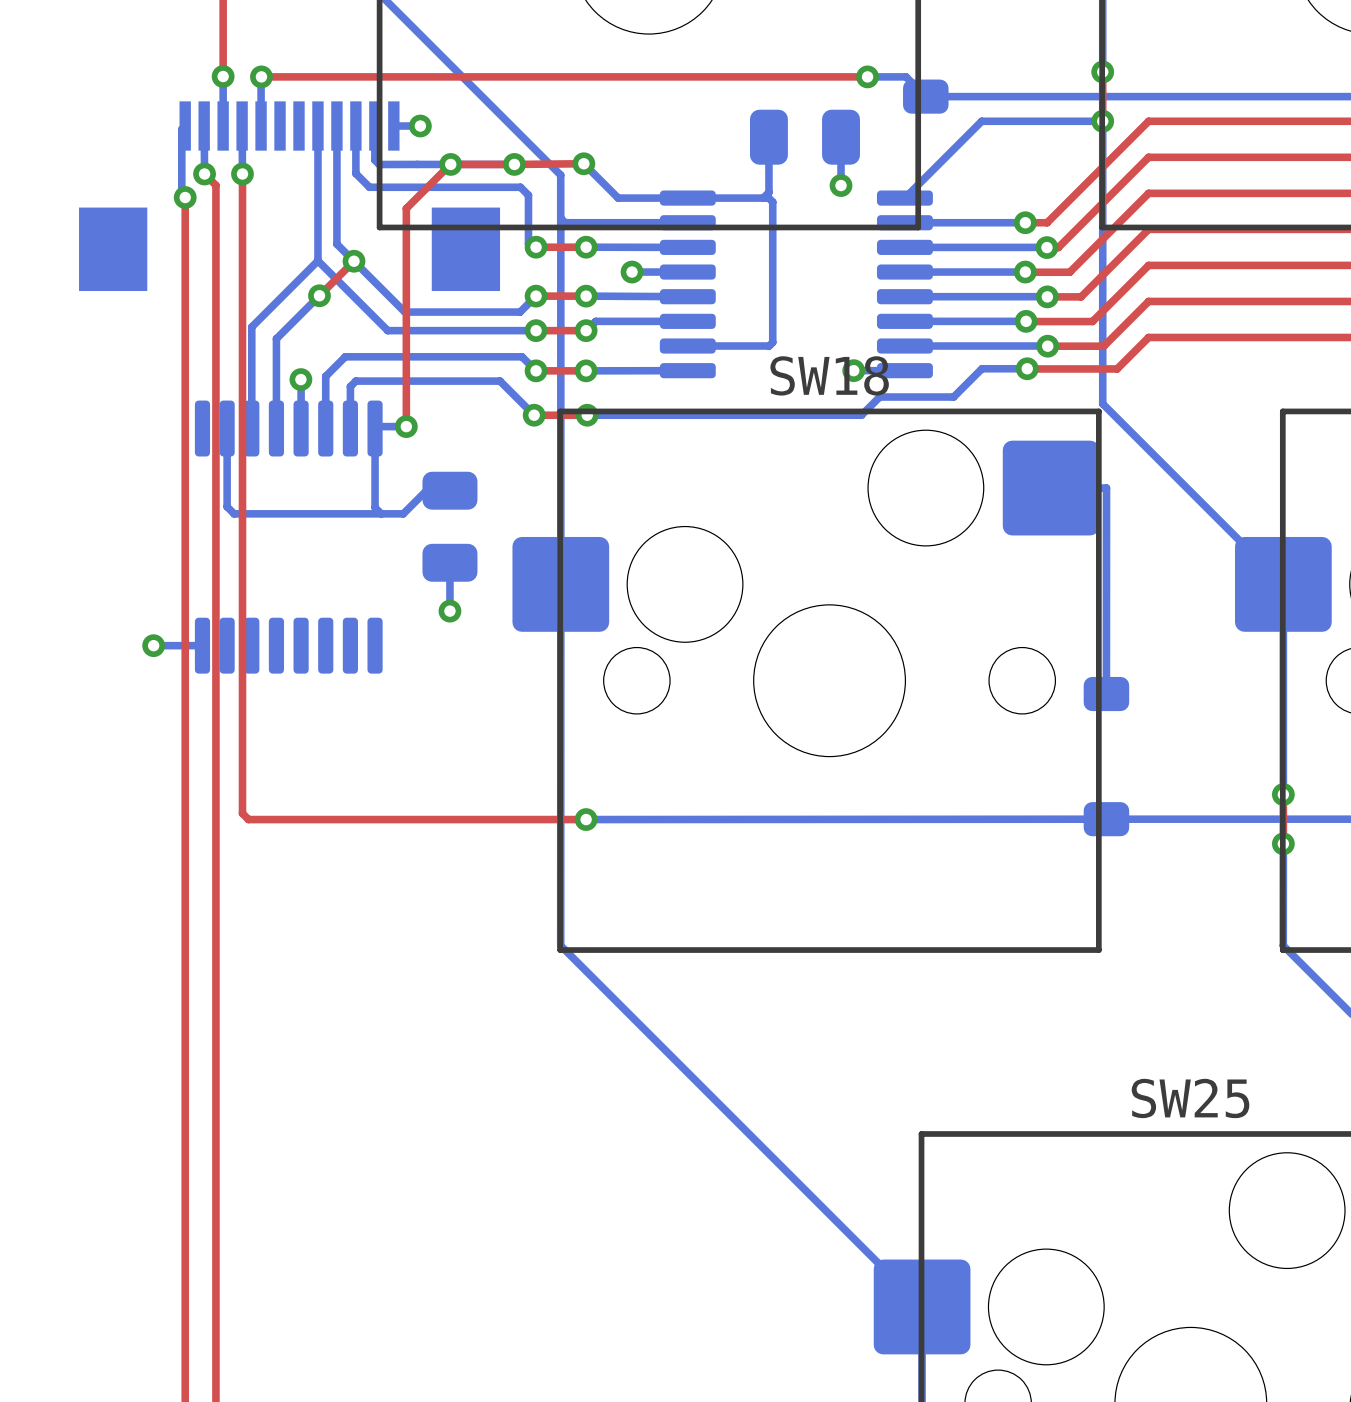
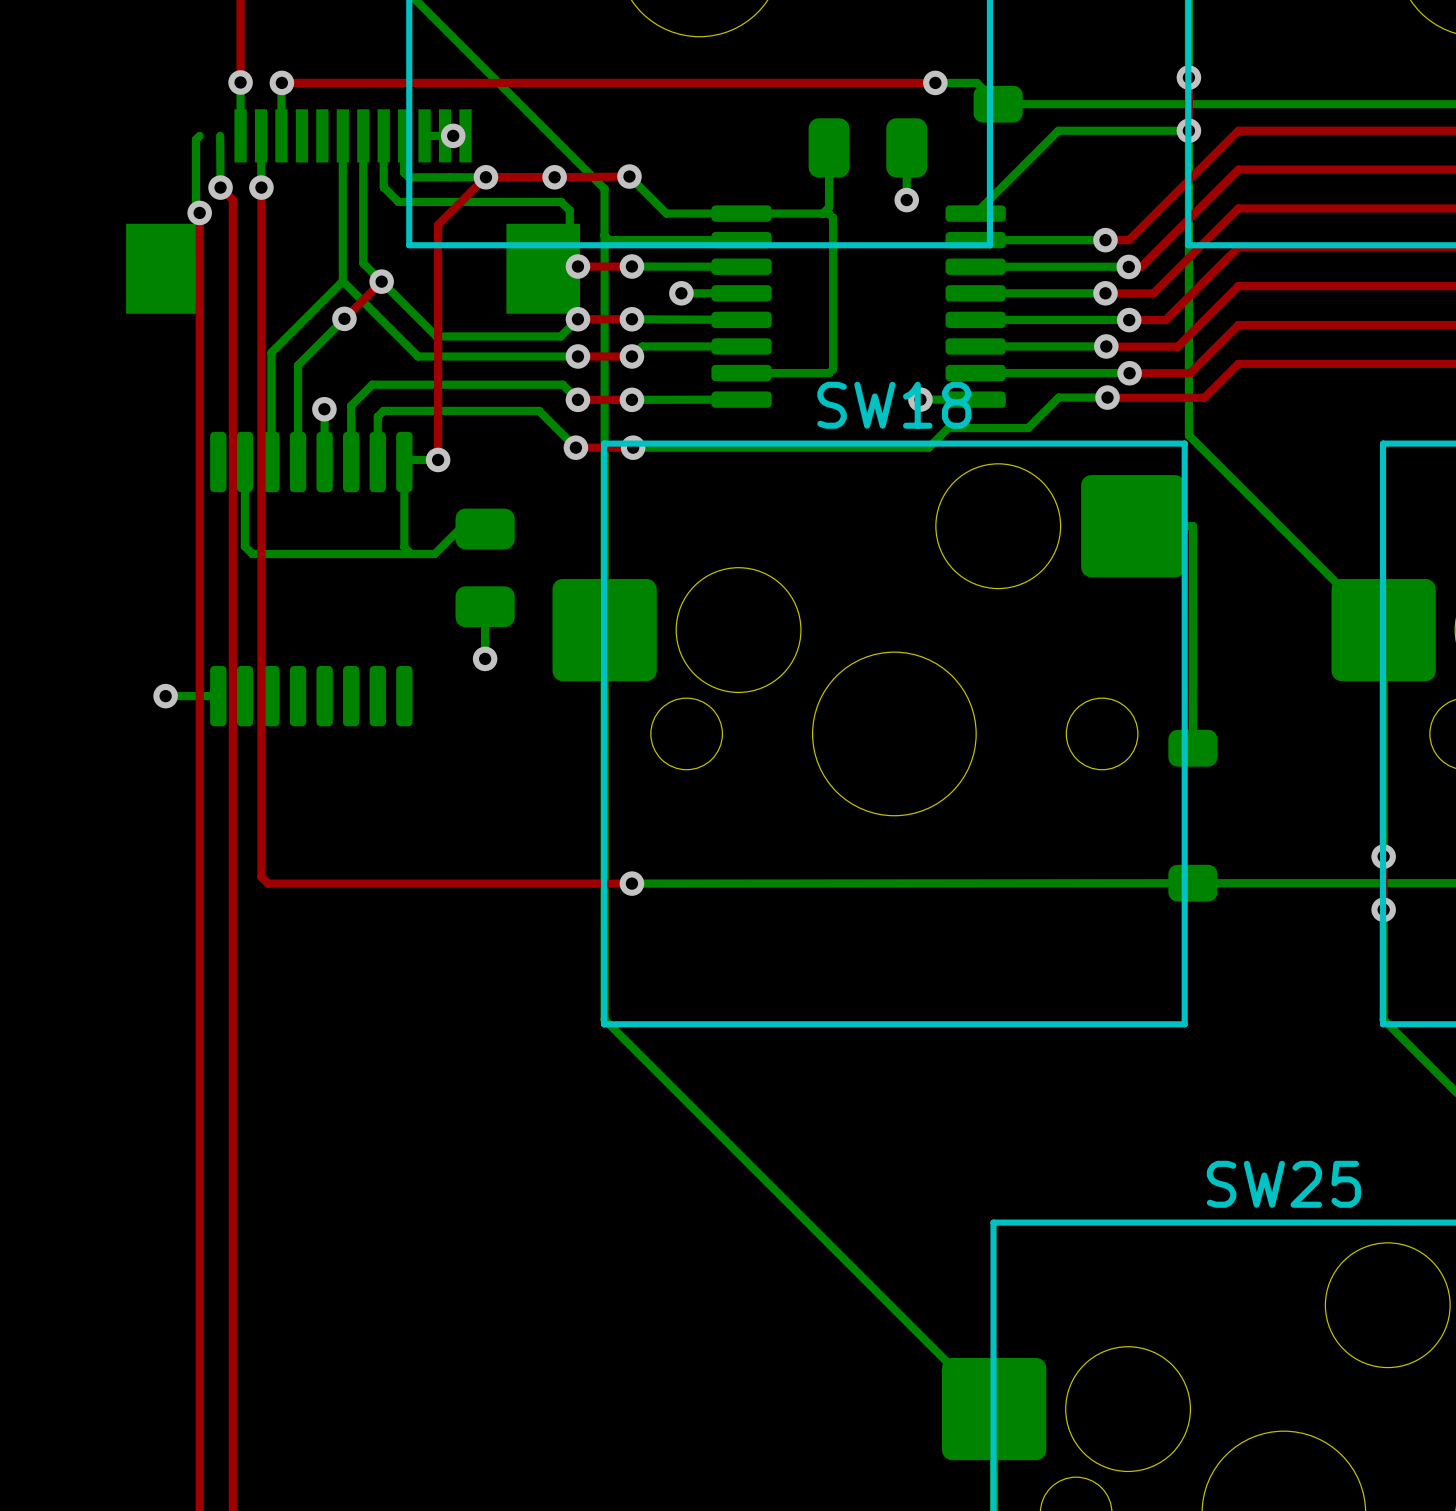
part position: (289, 196) -> (353, 211)

